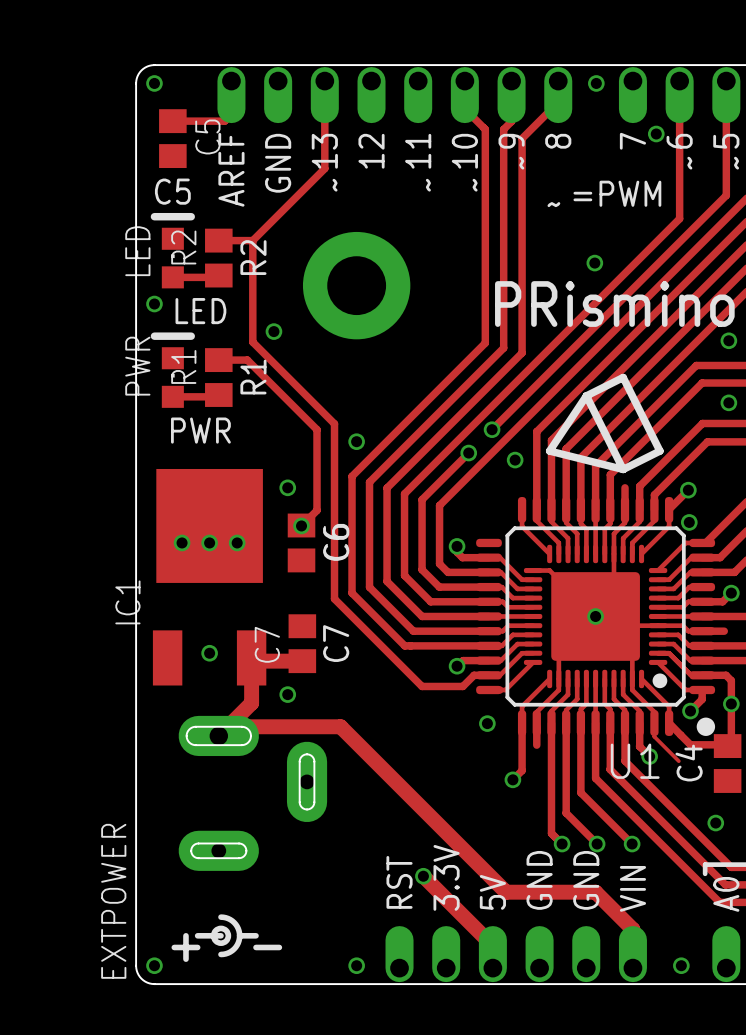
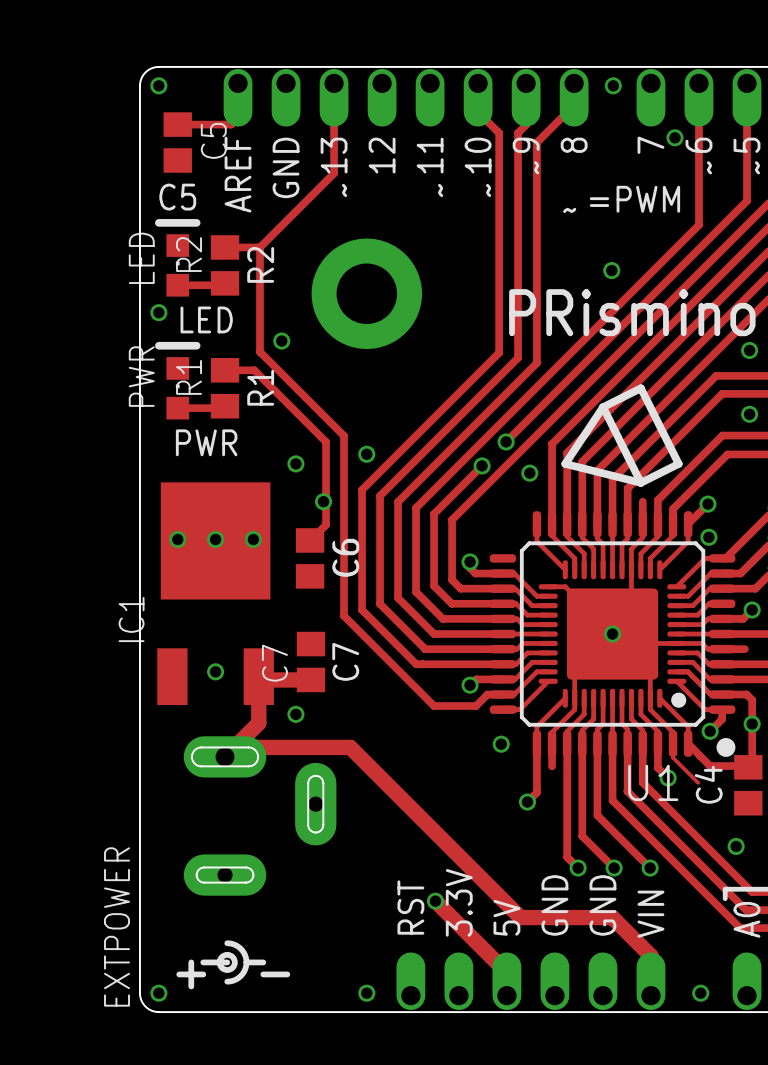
via: none -> (295, 463)
via: (287, 487) -> none
via: none -> (323, 501)
via: none -> (177, 539)
via: none -> (215, 539)
via: none -> (253, 539)
via: (301, 525) -> none
via: (182, 542) -> none
via: (209, 542) -> none
via: (237, 542) -> none

